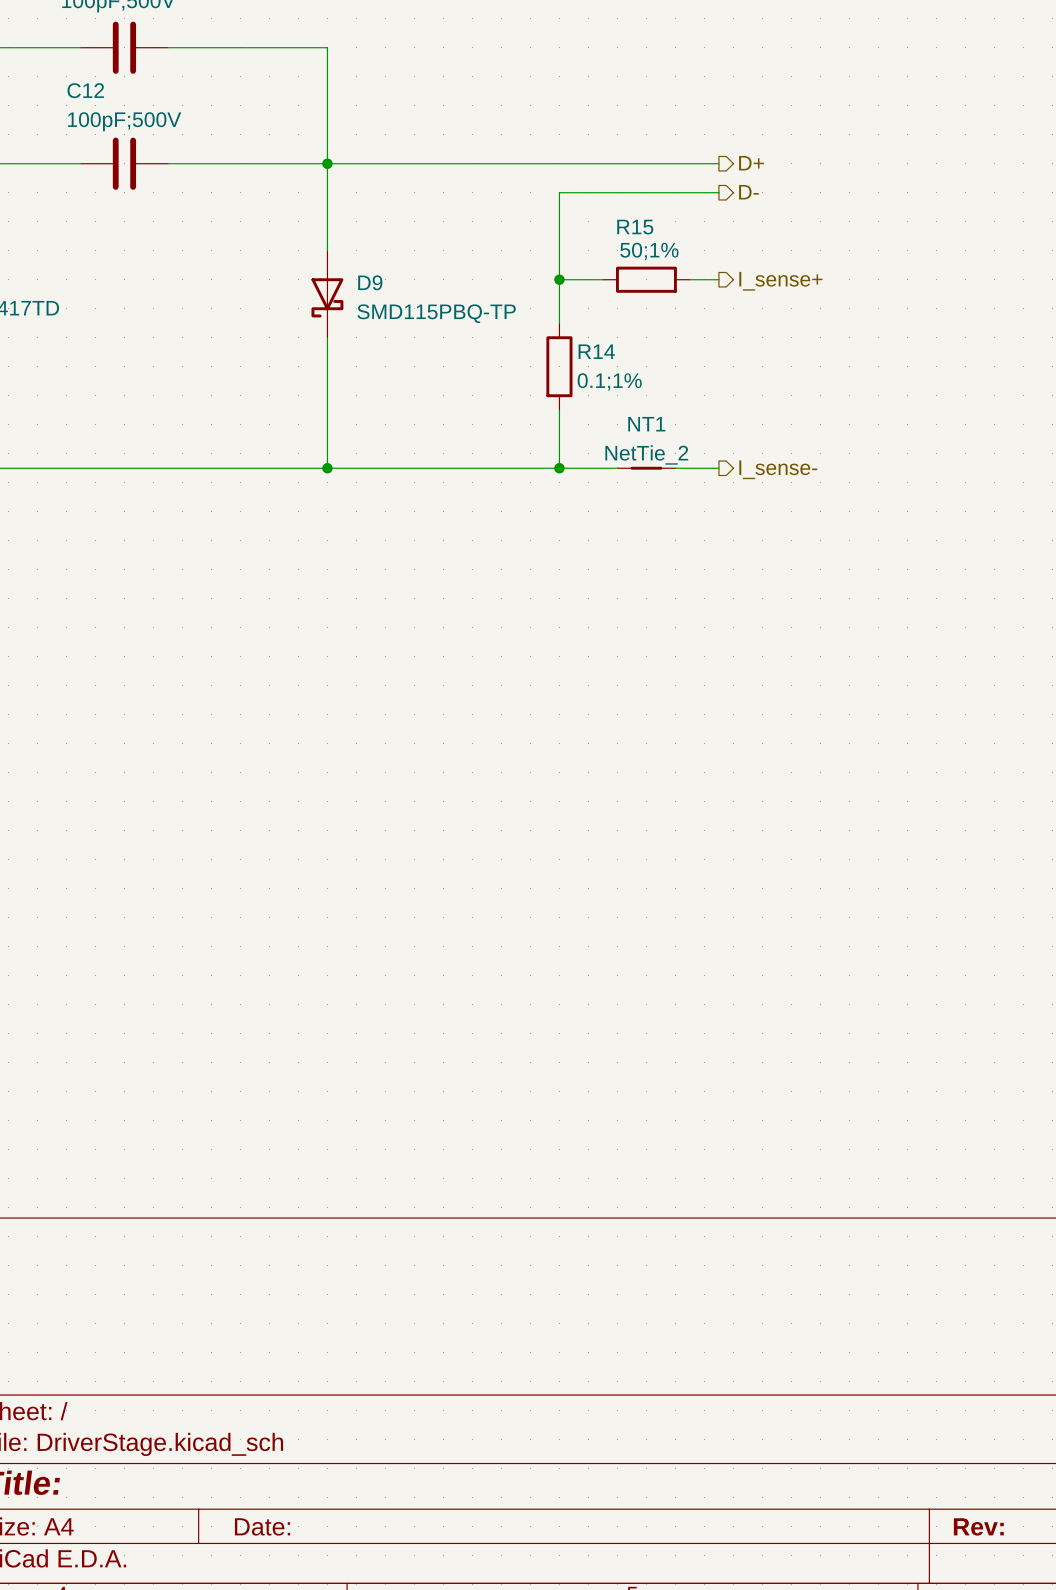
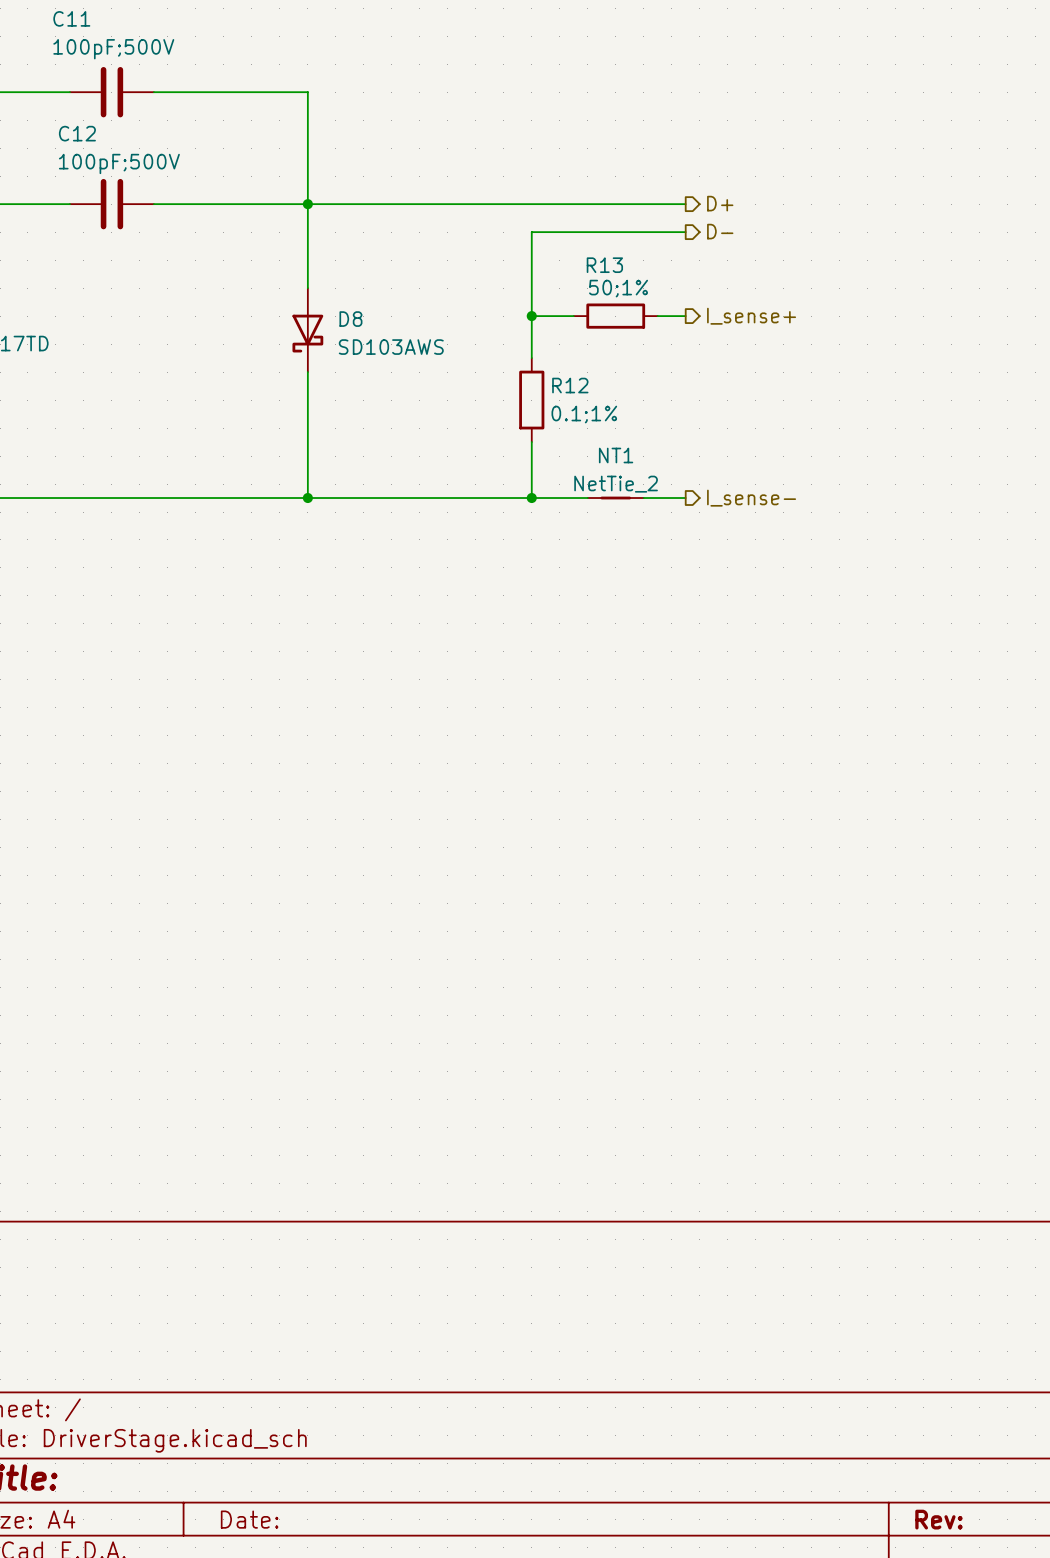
R15 name: R15 (635, 227) -> R13 (604, 265)
D9 name: D9 (370, 282) -> D8 (350, 319)
D9 value: SMD115PBQ-TP (436, 313) -> SD103AWS (391, 347)
R14 name: R14 (596, 351) -> R12 (570, 385)

